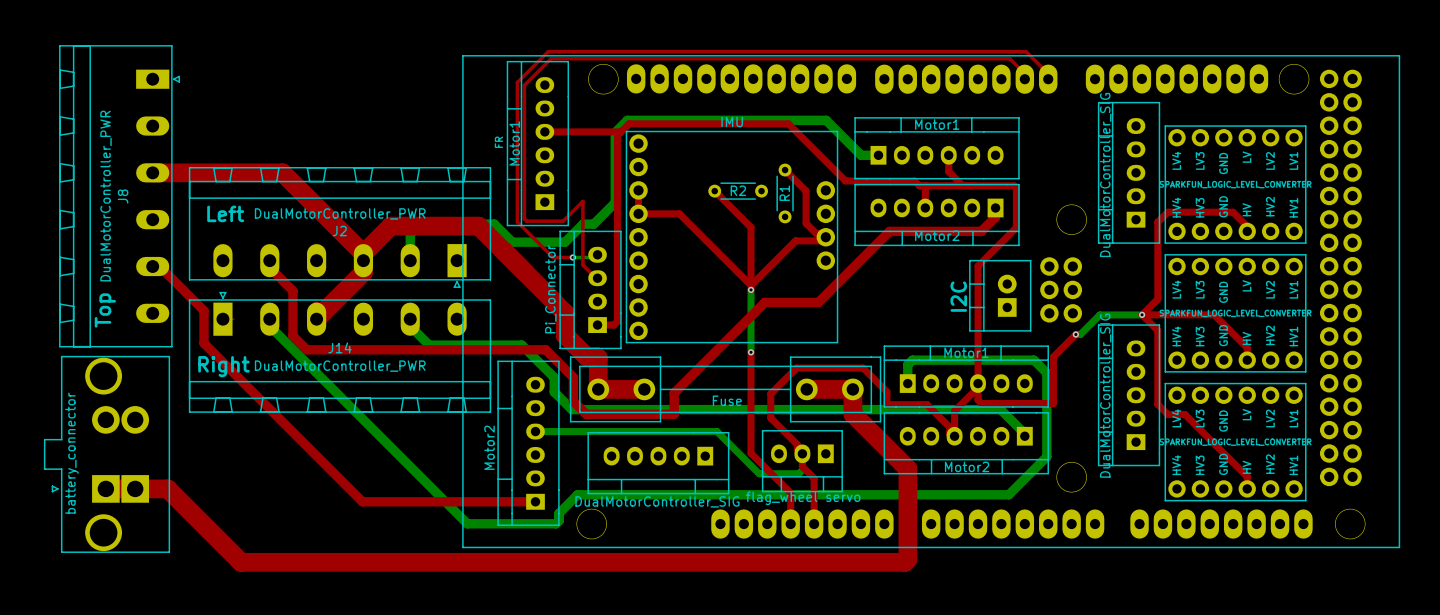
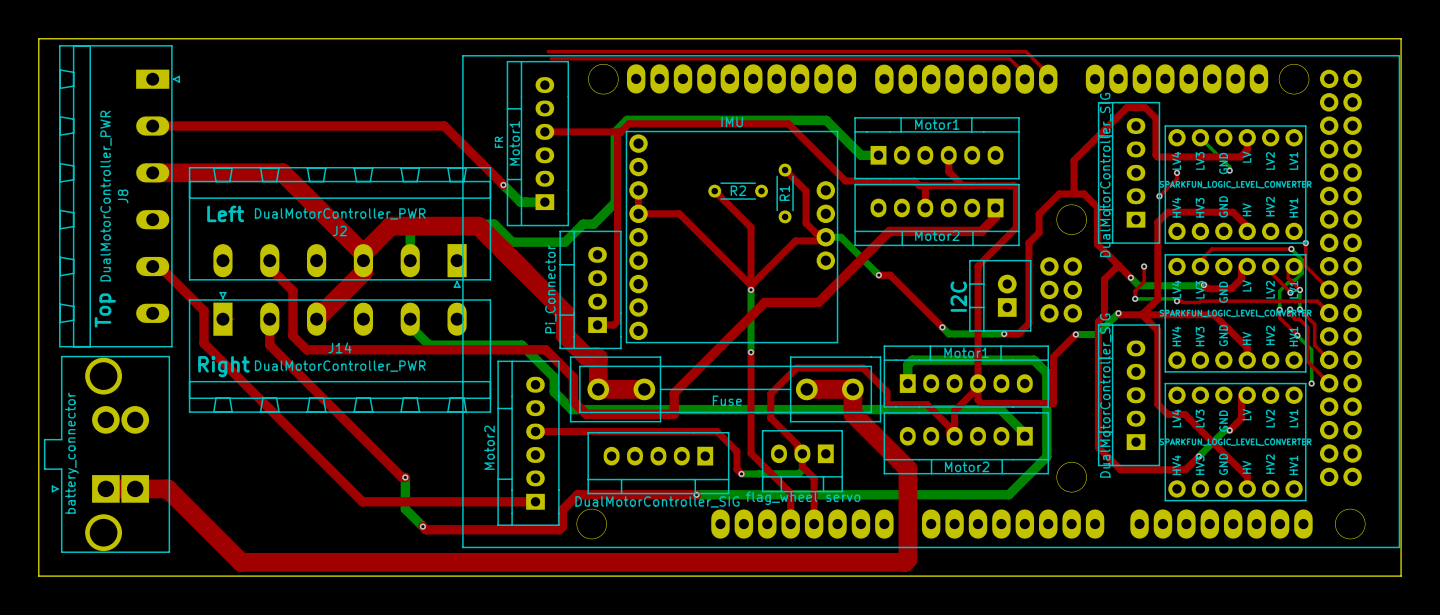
board edge: none -> (38, 38) (38, 576) (1401, 576) (1401, 38) (38, 38)
top track: (548, 51) (517, 82) (517, 221) (552, 257) (572, 257) -> none
top track: (551, 58) (524, 85) (524, 218) (526, 221) (563, 221) (582, 201) (582, 264) (596, 278) -> none
top track: none -> (152, 126) (444, 126) (503, 185)
bottom track: none -> (1200, 137) (1229, 167) (1229, 170)
top track: none -> (1247, 137) (1247, 149) (1240, 156) (1157, 156) (1155, 154) (1155, 118) (1145, 107) (1126, 107) (1073, 160) (1073, 193)
via: none -> (1229, 170)
top track: none -> (1177, 172) (1177, 178) (1159, 196)
via: none -> (1177, 172)
bottom track: none -> (503, 185) (520, 202) (544, 202)
via: none -> (503, 185)
via: none -> (1159, 196)
bottom track: none -> (825, 237) (840, 237) (878, 275)
top track: none -> (1305, 243) (1305, 266) (1329, 289)
via: none -> (1305, 243)
bottom track: none -> (1291, 249) (1302, 259) (1302, 273) (1294, 280) (1290, 280) (1279, 291) (1279, 309)
top track: none -> (1291, 249) (1212, 249) (1194, 266)
via: none -> (1291, 249)
bottom track: (572, 257) (594, 257) -> none
via: (572, 257) -> none
top track: none -> (1118, 265) (1104, 279) (1104, 315) (1098, 321) (1098, 447) (1120, 469) (1185, 469) (1198, 456)
top track: none -> (1144, 266) (1144, 281) (1135, 290) (1135, 298)
via: none -> (1144, 266)
top track: none -> (1241, 266) (1241, 278) (1231, 288) (1207, 288) (1203, 284)
top track: none -> (1264, 266) (1290, 292)
top track: none -> (1288, 266) (1288, 278) (1299, 289)
top track: none -> (878, 275) (890, 275) (942, 327)
via: none -> (878, 275)
bottom track: none -> (1130, 277) (1138, 285) (1203, 284)
top track: none -> (1130, 277) (1097, 244) (1097, 207) (1084, 193) (1059, 193) (1039, 214) (1039, 232) (1028, 242) (1028, 323) (1018, 333) (1004, 333)
via: none -> (1130, 277)
via: none -> (1203, 284)
bottom track: none -> (1299, 289) (1299, 309)
via: none -> (1299, 289)
via: none -> (1290, 292)
bottom track: none -> (1135, 298) (1174, 298) (1177, 301)
via: none -> (1135, 298)
top track: none -> (1177, 301) (1317, 301) (1329, 313)
via: none -> (1177, 301)
top track: none -> (1279, 309) (1279, 317) (1297, 335)
via: none -> (1279, 309)
top track: none -> (1290, 309) (1290, 314) (1295, 319) (1299, 319) (1307, 327) (1307, 361) (1329, 383)
via: none -> (1290, 309)
top track: none -> (1299, 309) (1314, 324) (1314, 345) (1329, 359)
via: none -> (1299, 309)
top track: none -> (1118, 313) (1142, 314)
via: none -> (1118, 313)
bottom track: (1141, 314) (1099, 314) (1080, 334) -> (1118, 313) (1097, 334) (1080, 334)
via: (1142, 314) -> none
top track: none -> (269, 319) (269, 345) (402, 477) (405, 477)
bottom track: (269, 326) (467, 523) (556, 523) (558, 520) (558, 513) (577, 494) (696, 494) -> none
bottom track: none -> (942, 327) (948, 333) (1004, 333)
via: none -> (942, 327)
via: none -> (1004, 333)
bottom track: none -> (1297, 335) (1311, 349) (1311, 383)
via: none -> (1297, 335)
via: none -> (1311, 383)
top track: none -> (1241, 395) (1241, 418) (1229, 430)
bottom track: none -> (1229, 430) (1224, 430) (1198, 456)
via: none -> (1229, 430)
bottom track: (535, 431) (716, 431) (759, 473) -> (741, 473) (759, 473)
top track: none -> (535, 431) (716, 431) (736, 451) (736, 469) (741, 473)
via: none -> (1198, 456)
via: none -> (741, 473)
bottom track: none -> (405, 477) (405, 509) (422, 526)
via: none -> (405, 477)
top track: none -> (696, 494) (577, 494) (562, 509) (562, 526) (559, 529) (426, 529) (422, 526)
via: none -> (696, 494)
via: none -> (422, 526)

